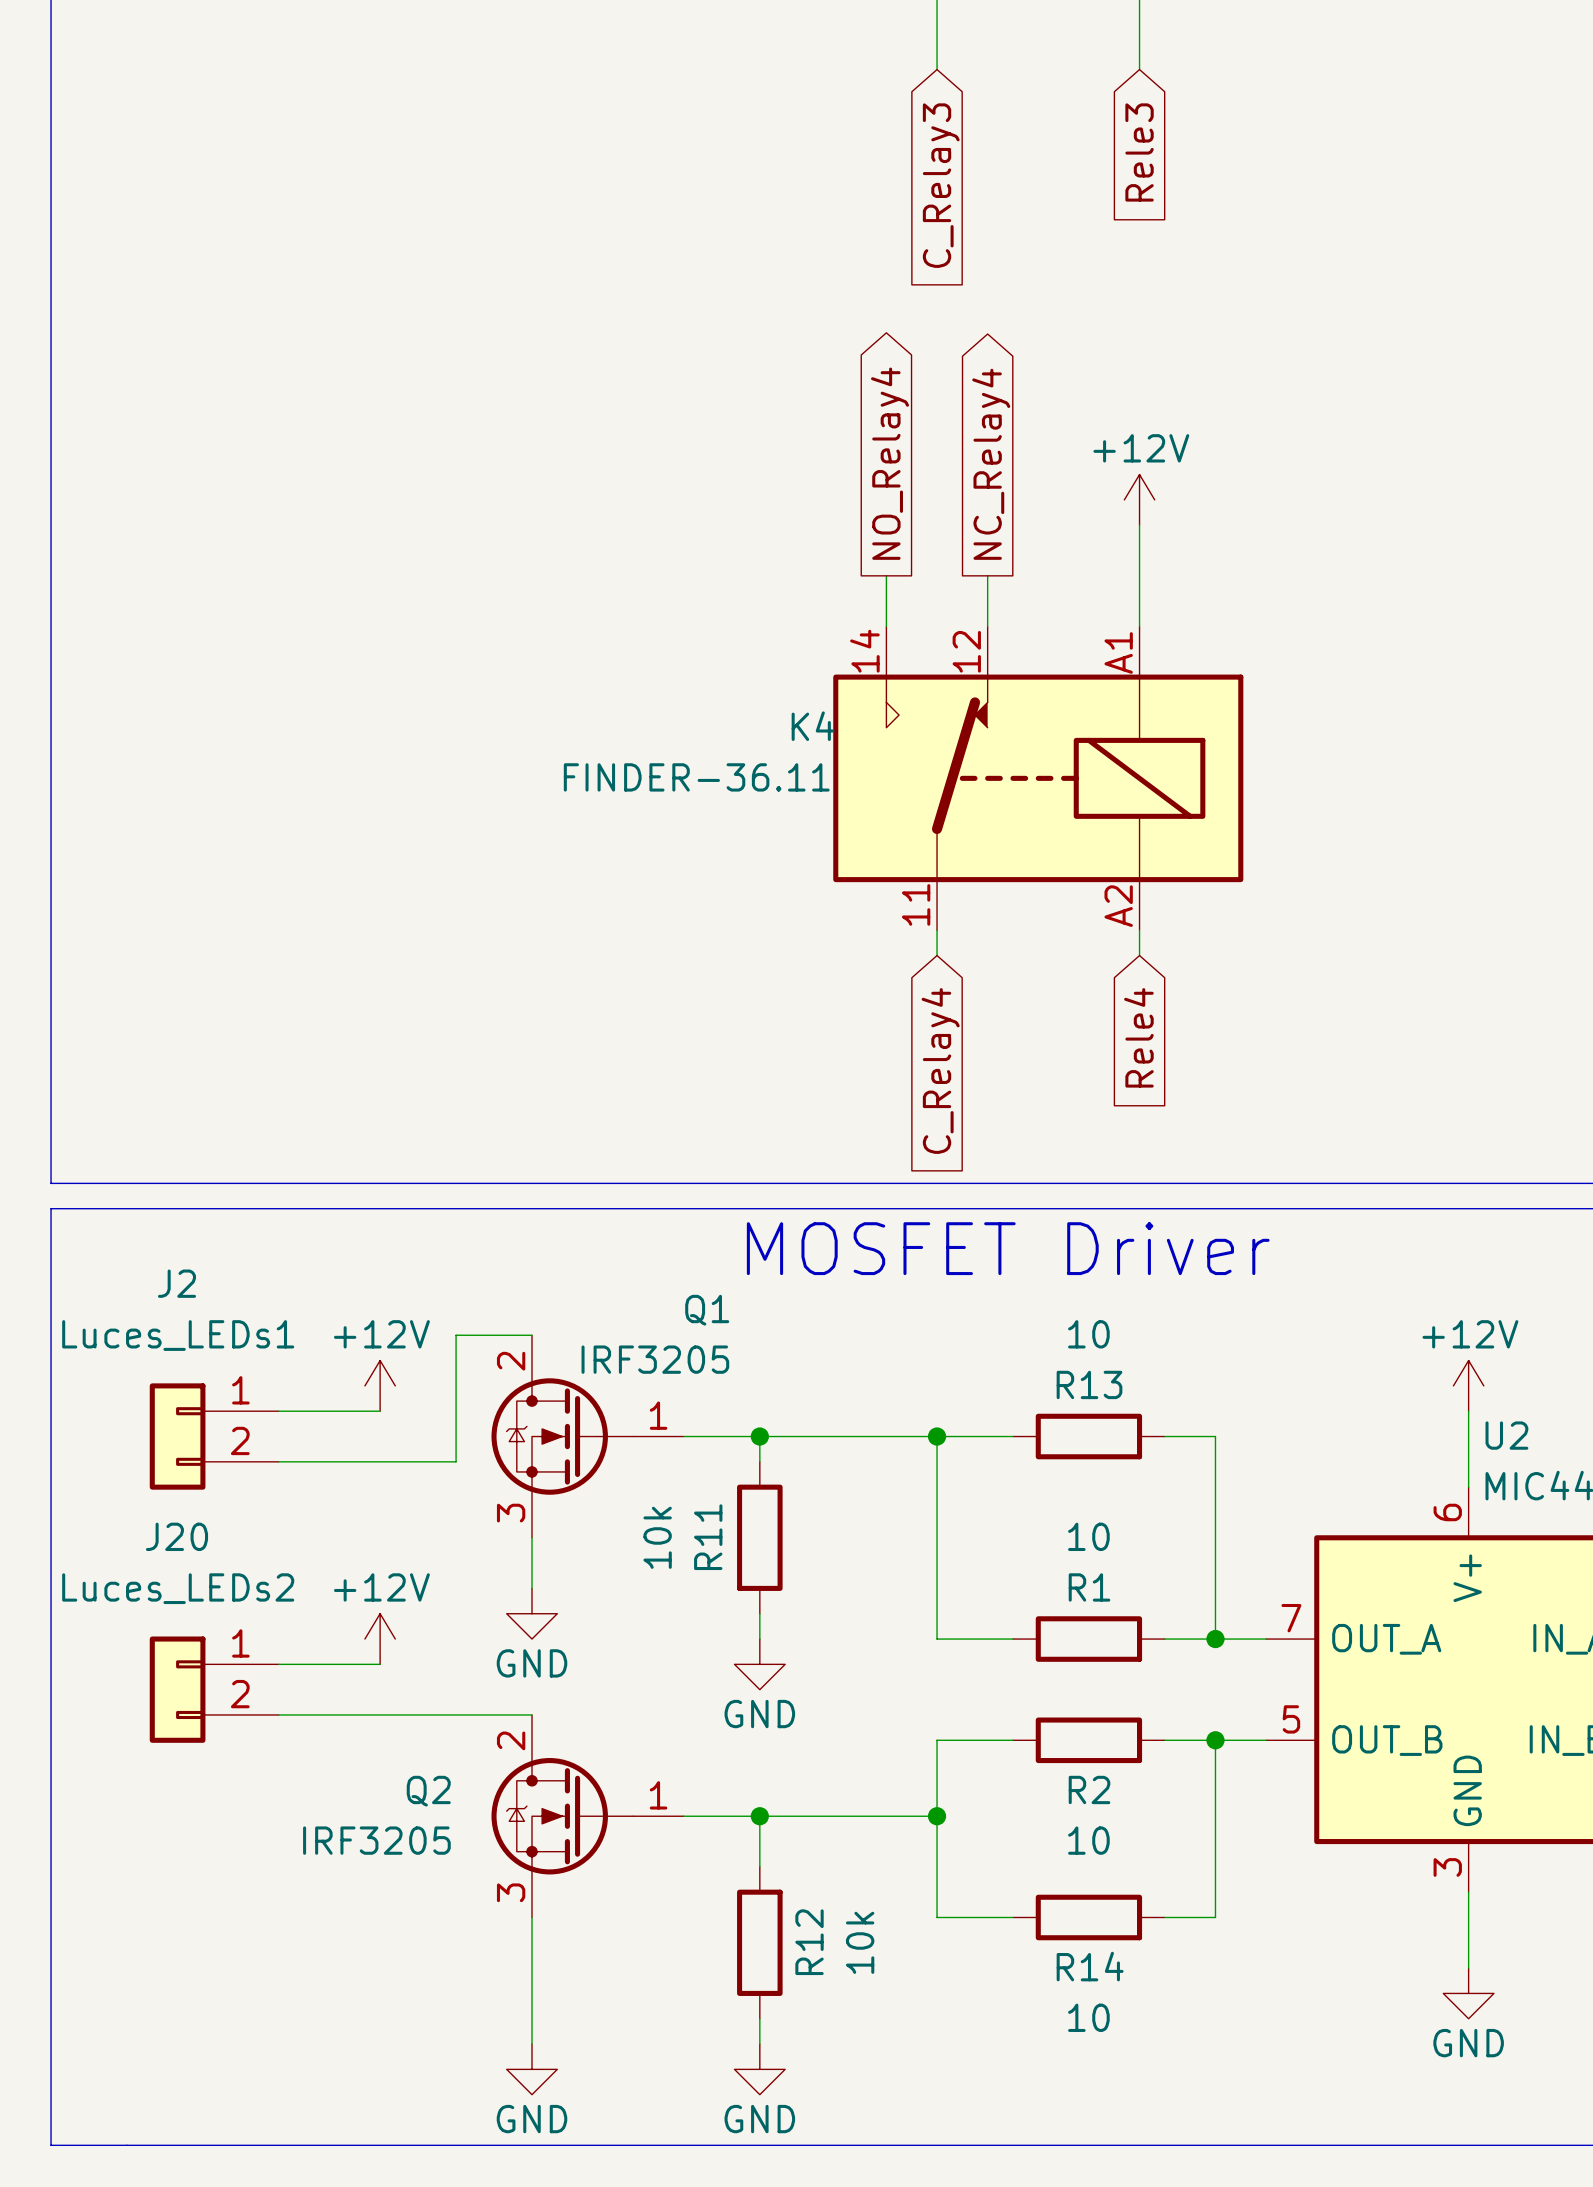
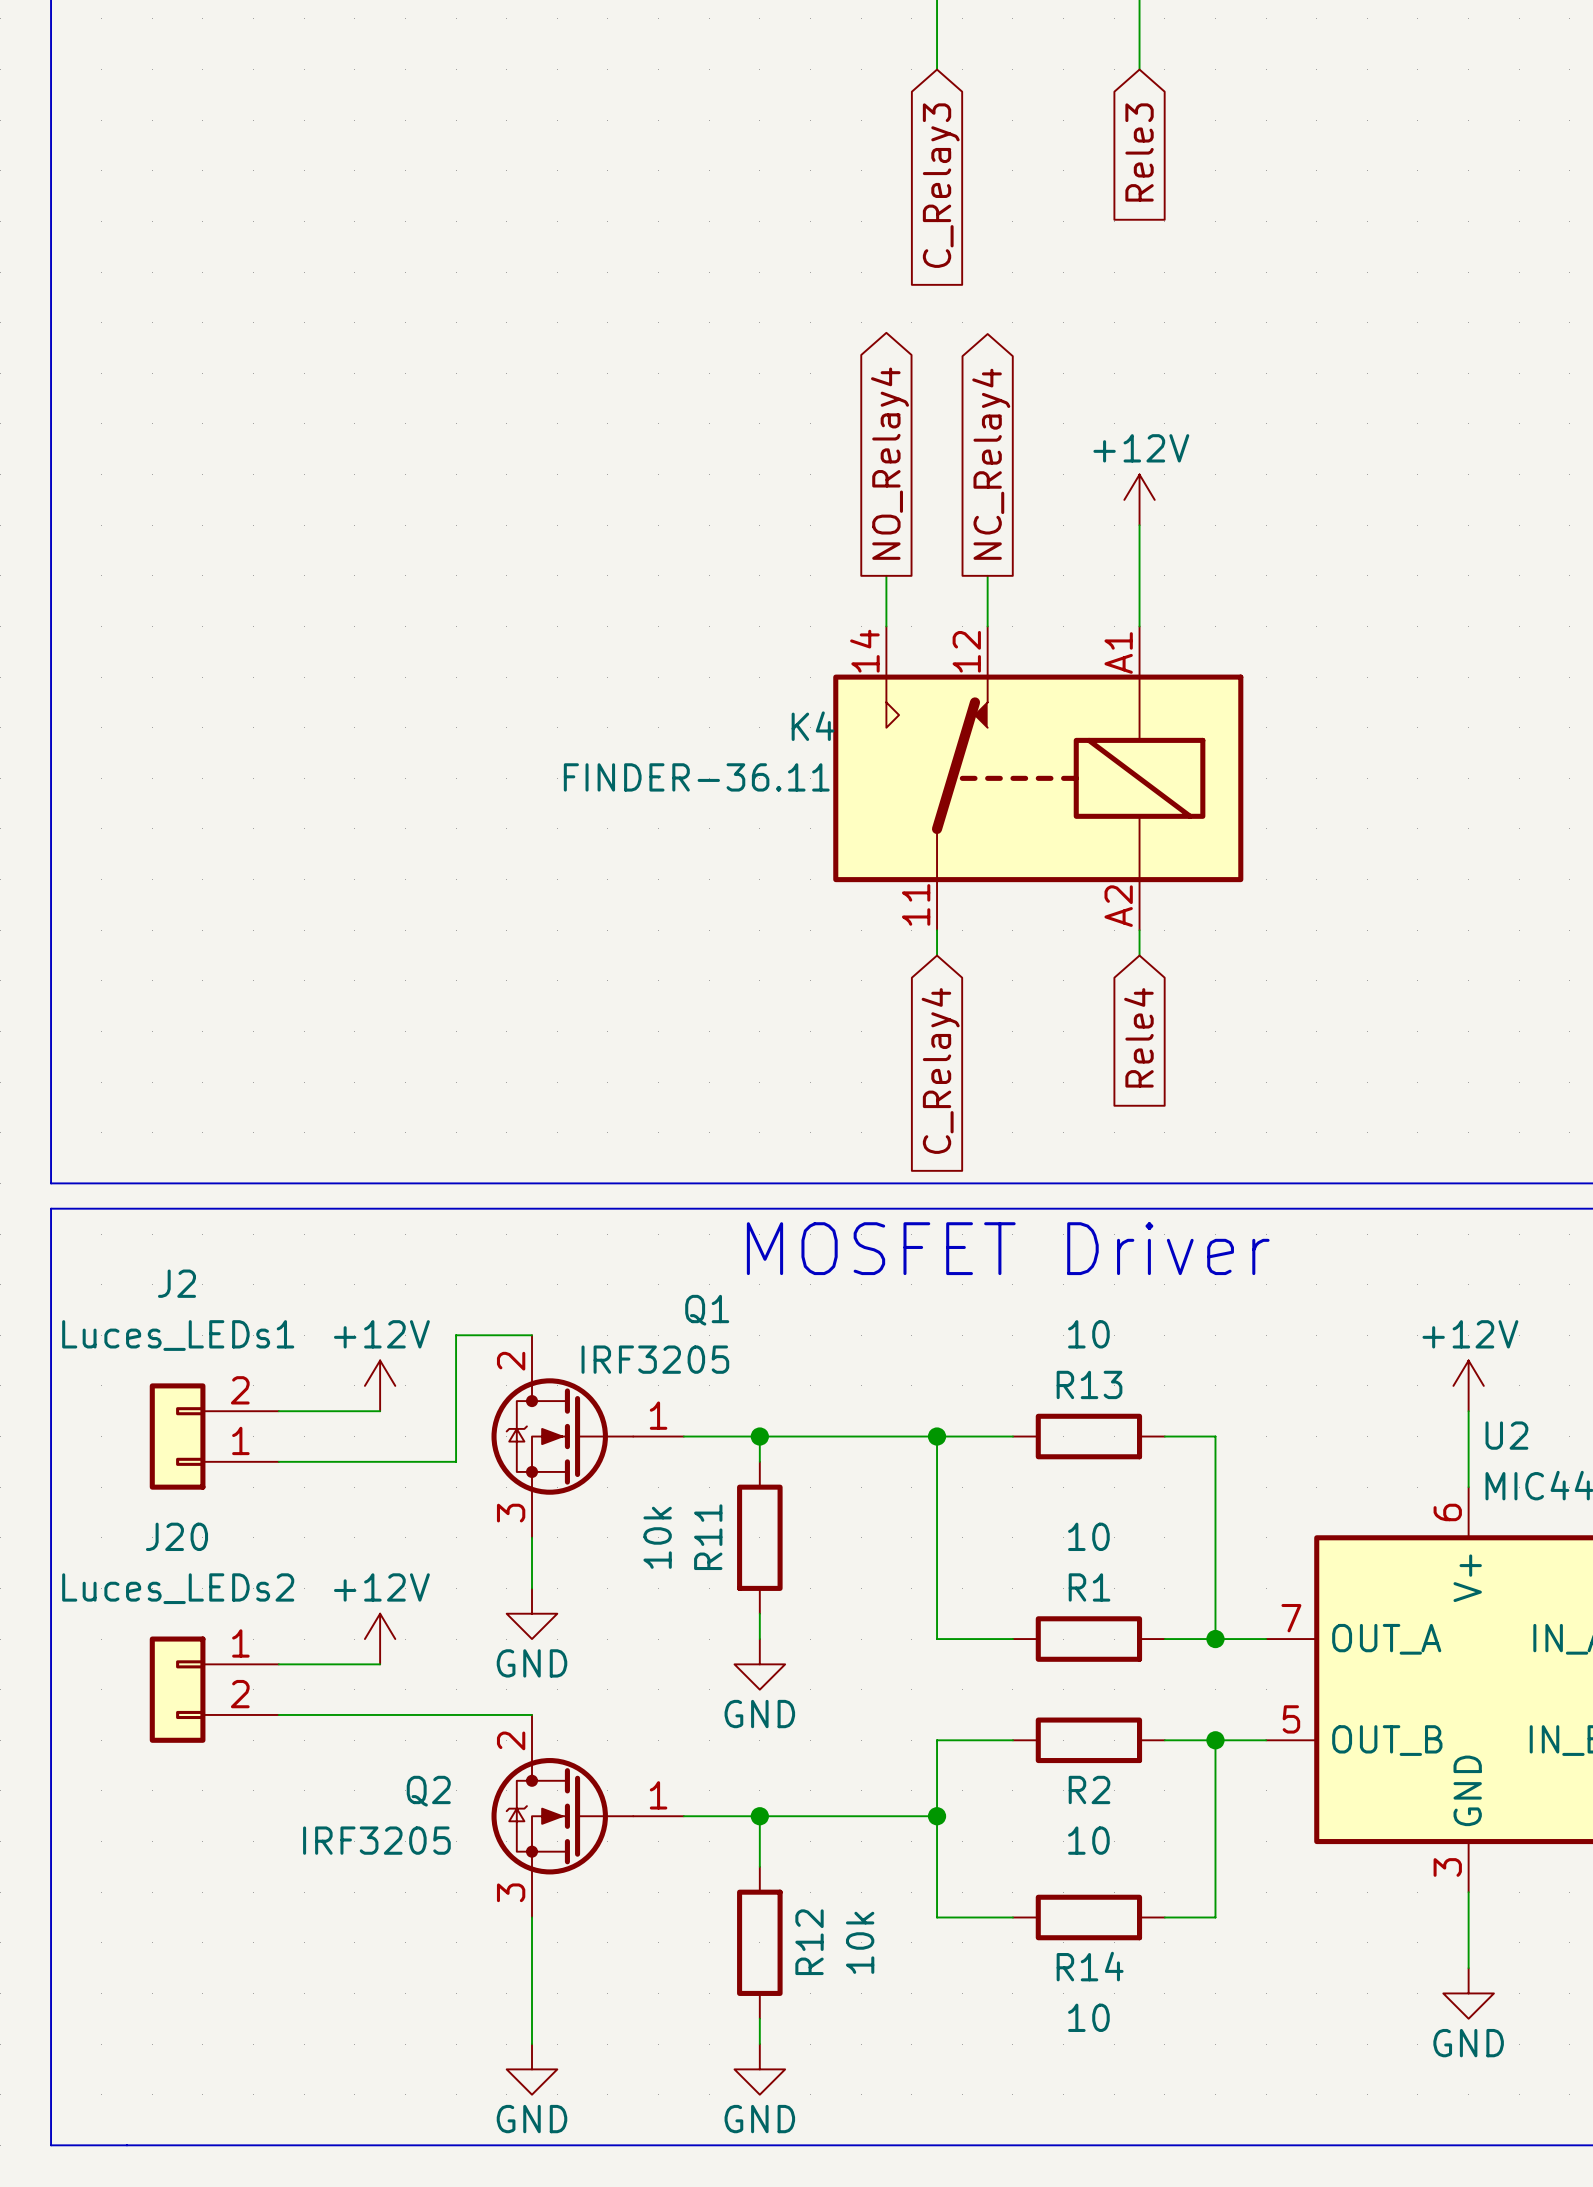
J2 flip: as is (177, 1436) -> up-down (177, 1436)

